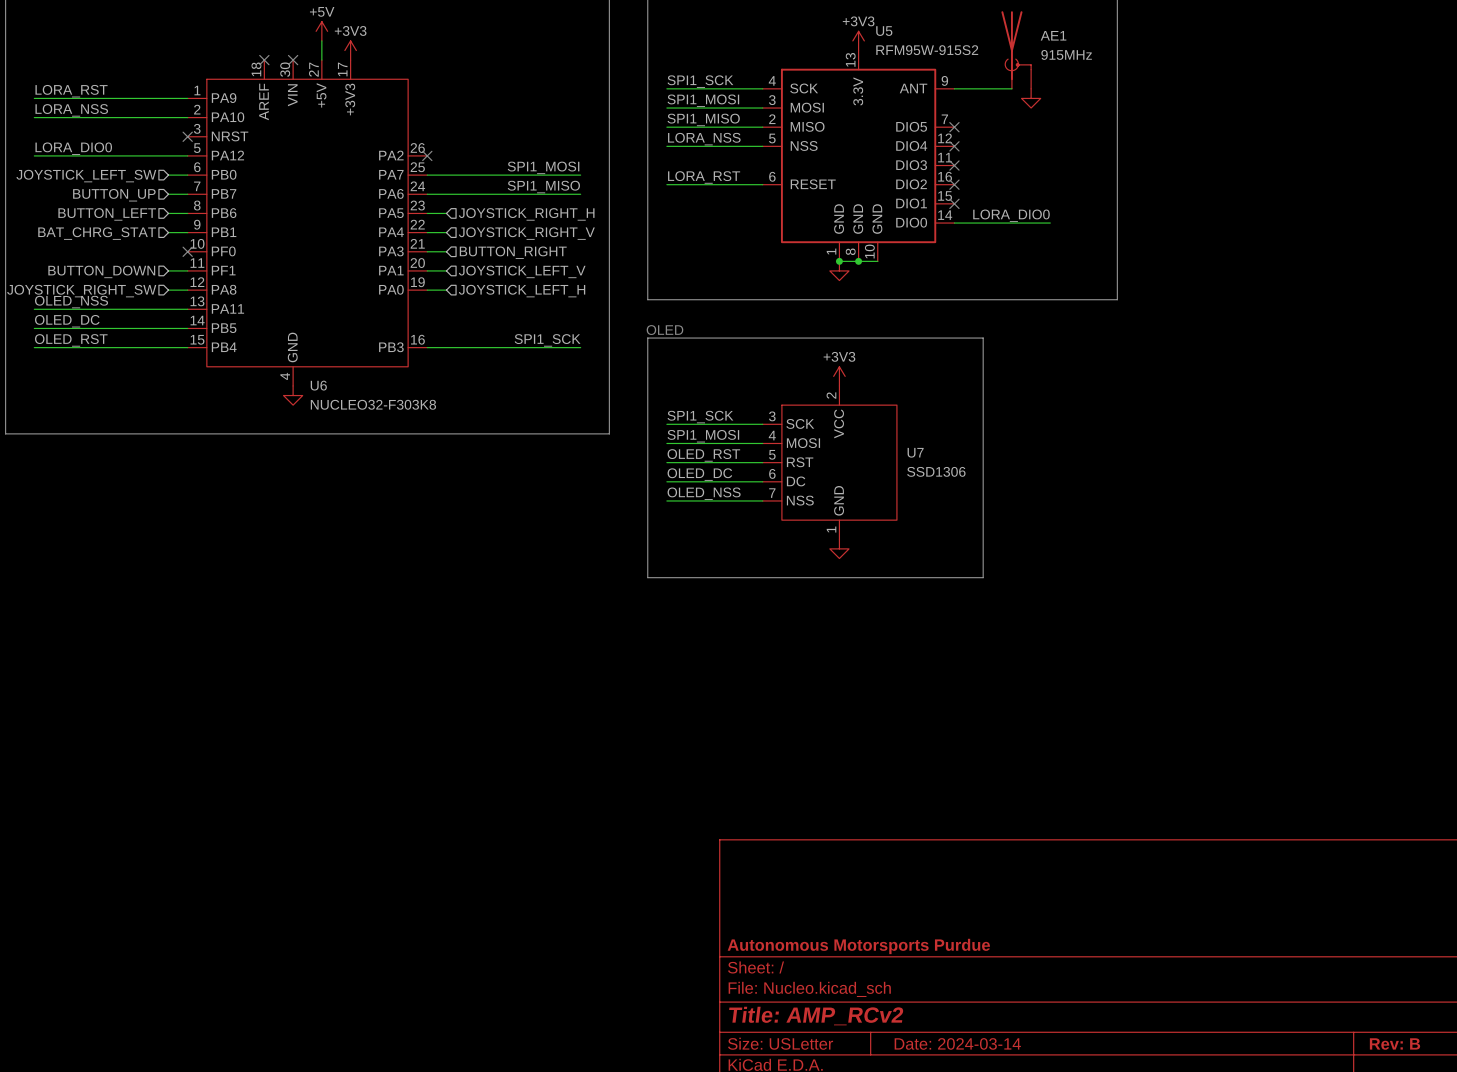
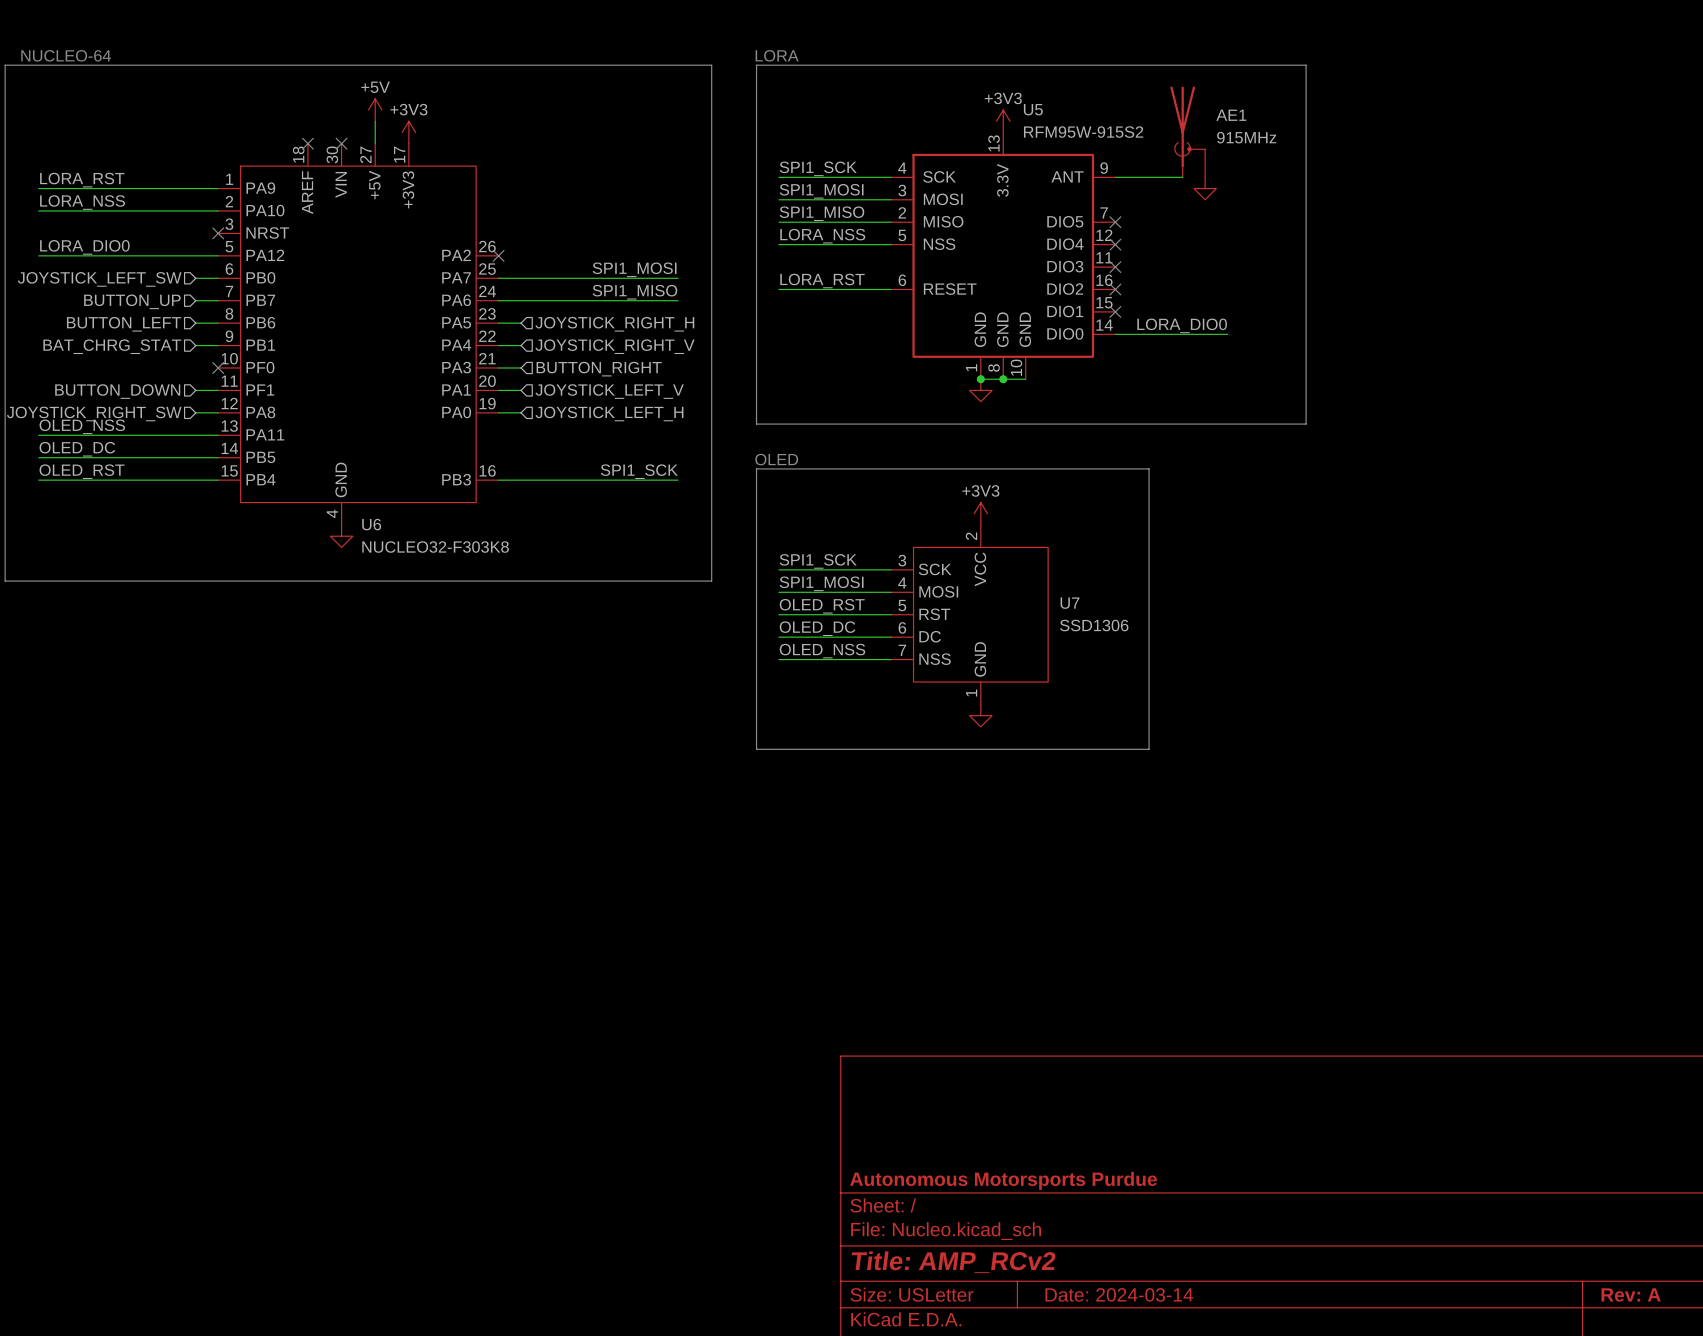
title block: Rev: B (1394, 1044) -> Rev: A (1631, 1294)

